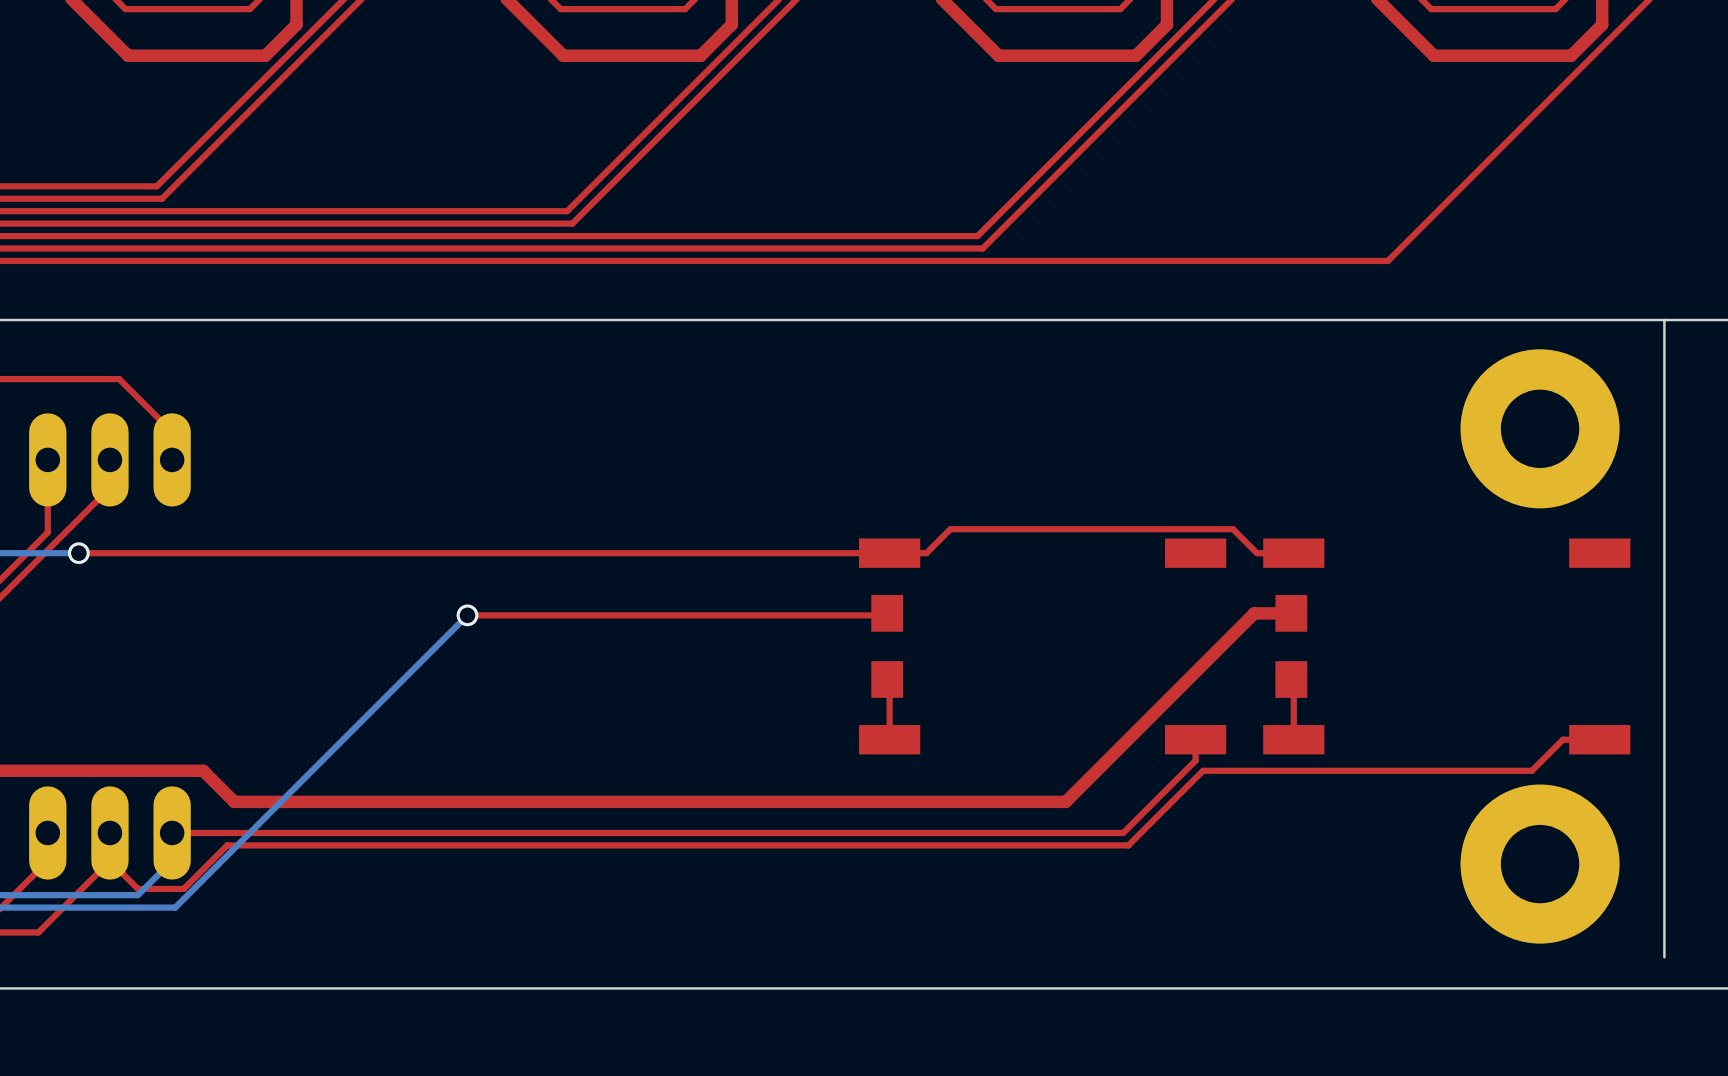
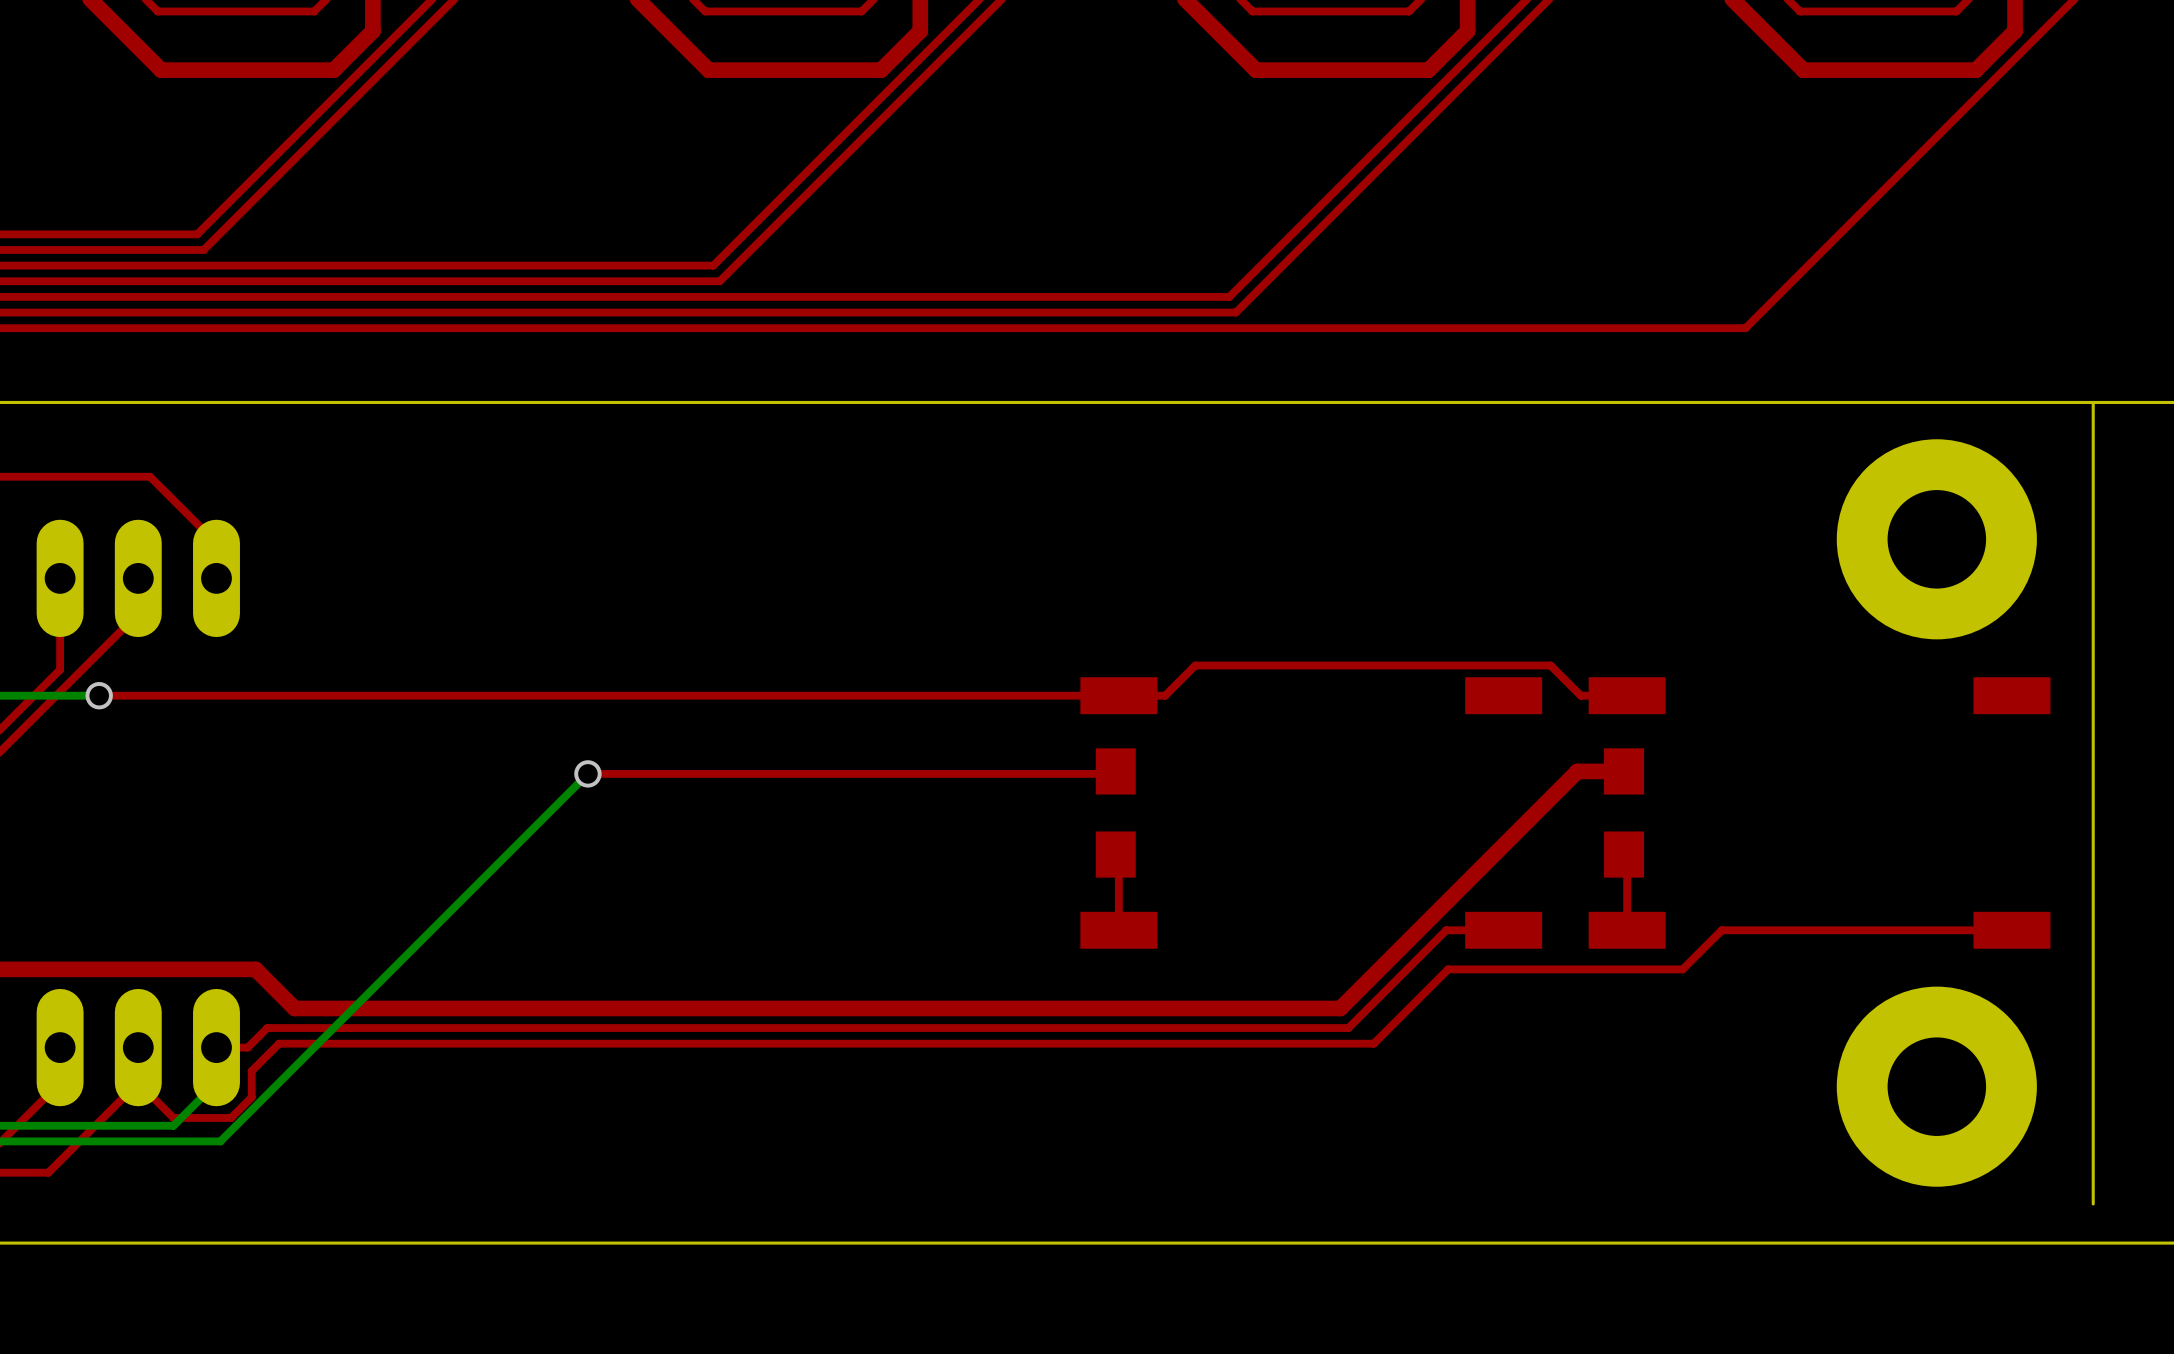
top track: (1195, 739) (1195, 760) (1123, 832) (197, 832) -> (1503, 930) (1446, 930) (1348, 1028) (267, 1028) (247, 1047)
top track: (1562, 739) (1531, 770) (1337, 770) -> (1965, 930) (1721, 930) (1682, 969)
top track: (1203, 770) (1128, 845) (227, 845) (200, 872) -> (1512, 969) (1448, 969) (1373, 1043) (279, 1043) (251, 1071) (251, 1097)

